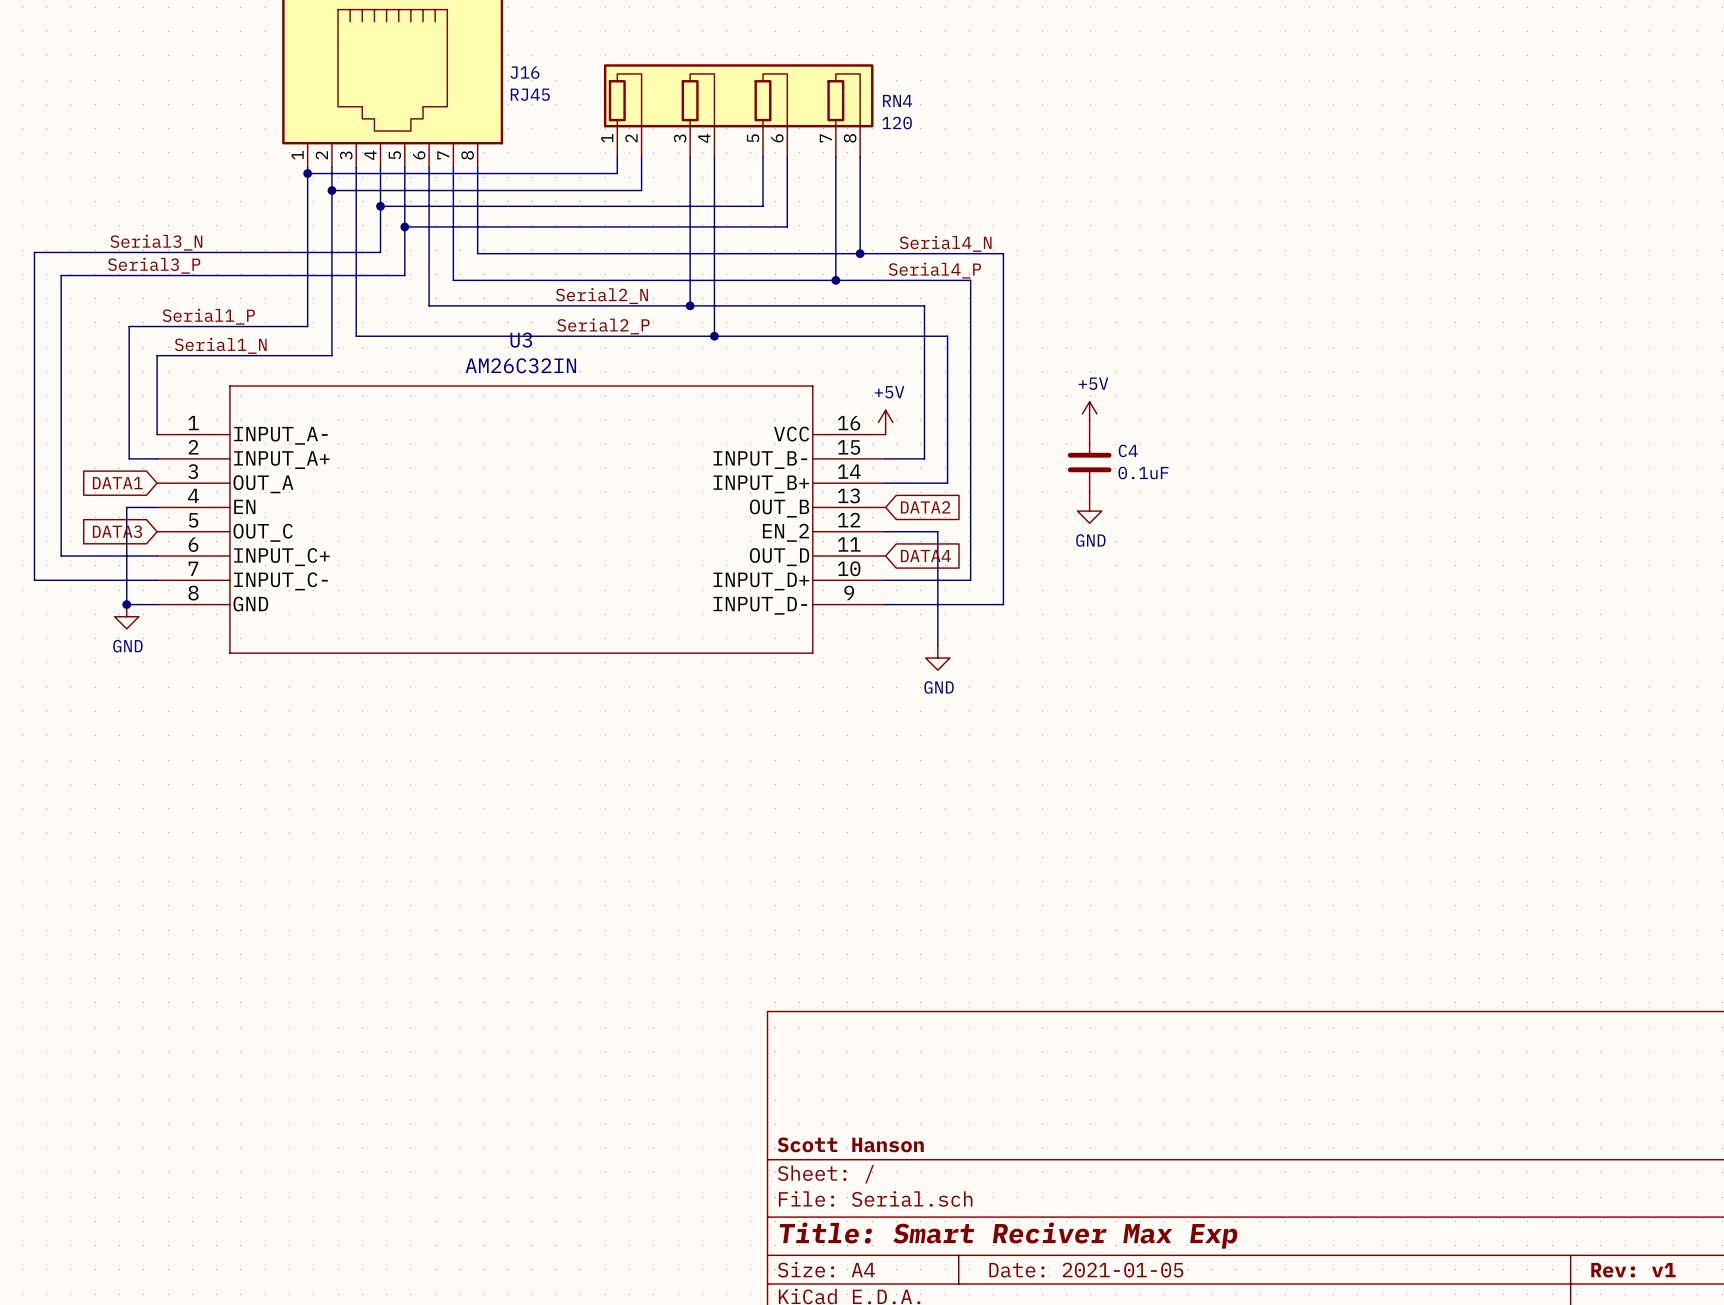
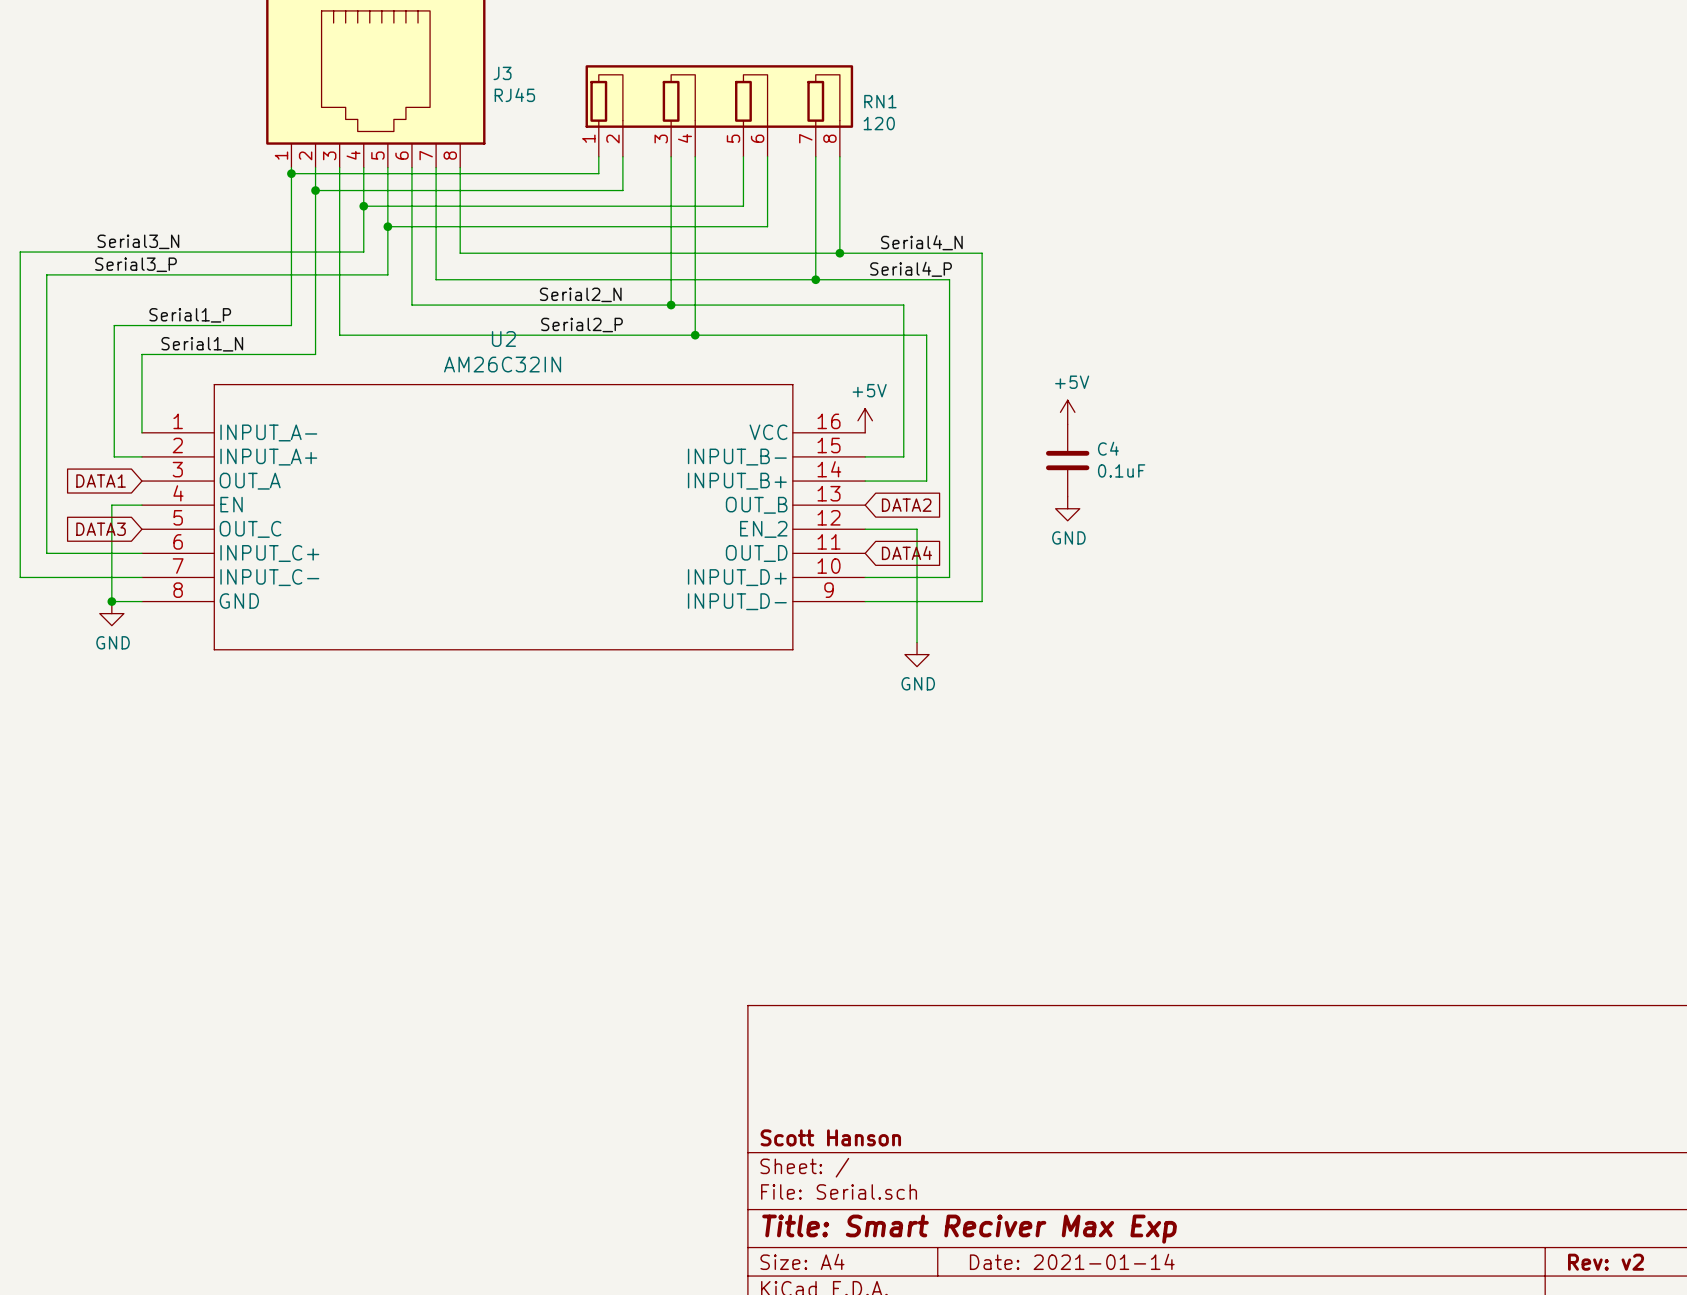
J16 name: J16 (524, 72) -> J3 (502, 73)
RN4 name: RN4 (897, 100) -> RN1 (880, 101)
U3 name: U3 (521, 340) -> U2 (503, 338)
title block: Date: 2021-01-05 (1086, 1270) -> Date: 2021-01-14 (1072, 1261)
title block: Rev: v1 (1633, 1270) -> Rev: v2 (1606, 1262)

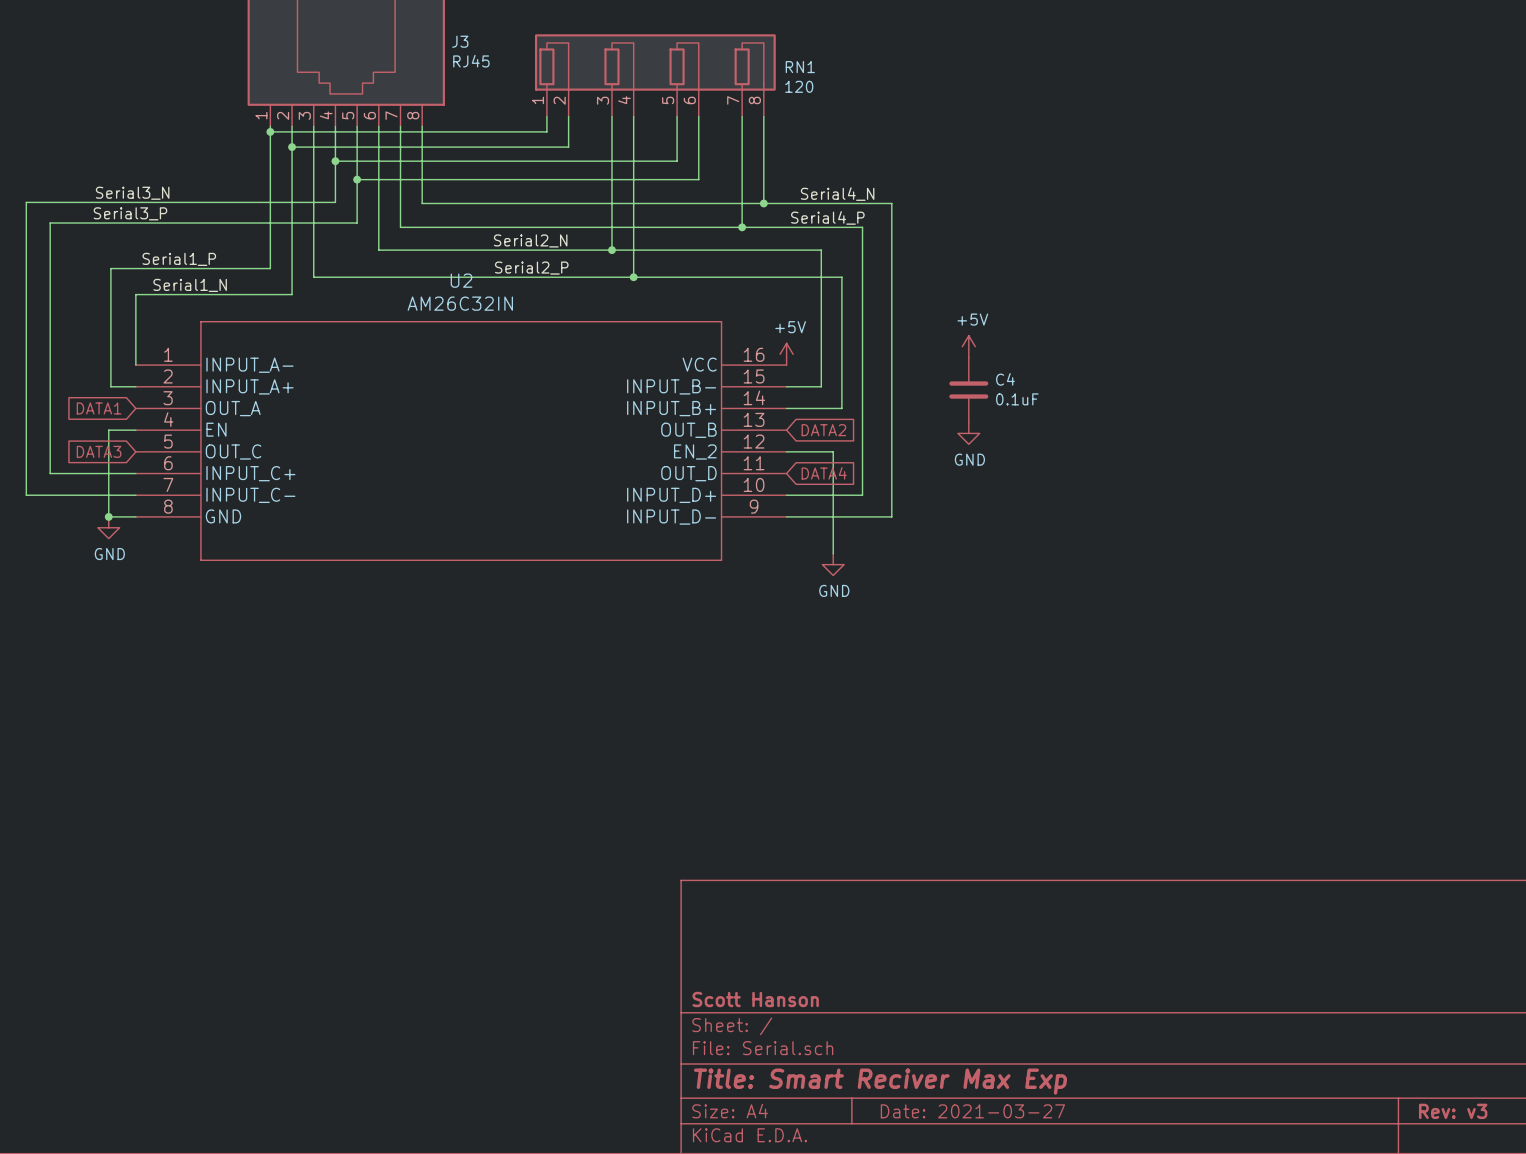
title block: Date: 2021-01-14 (1072, 1261) -> Date: 2021-03-27 (972, 1111)
title block: Rev: v2 (1606, 1262) -> Rev: v3 (1453, 1111)

